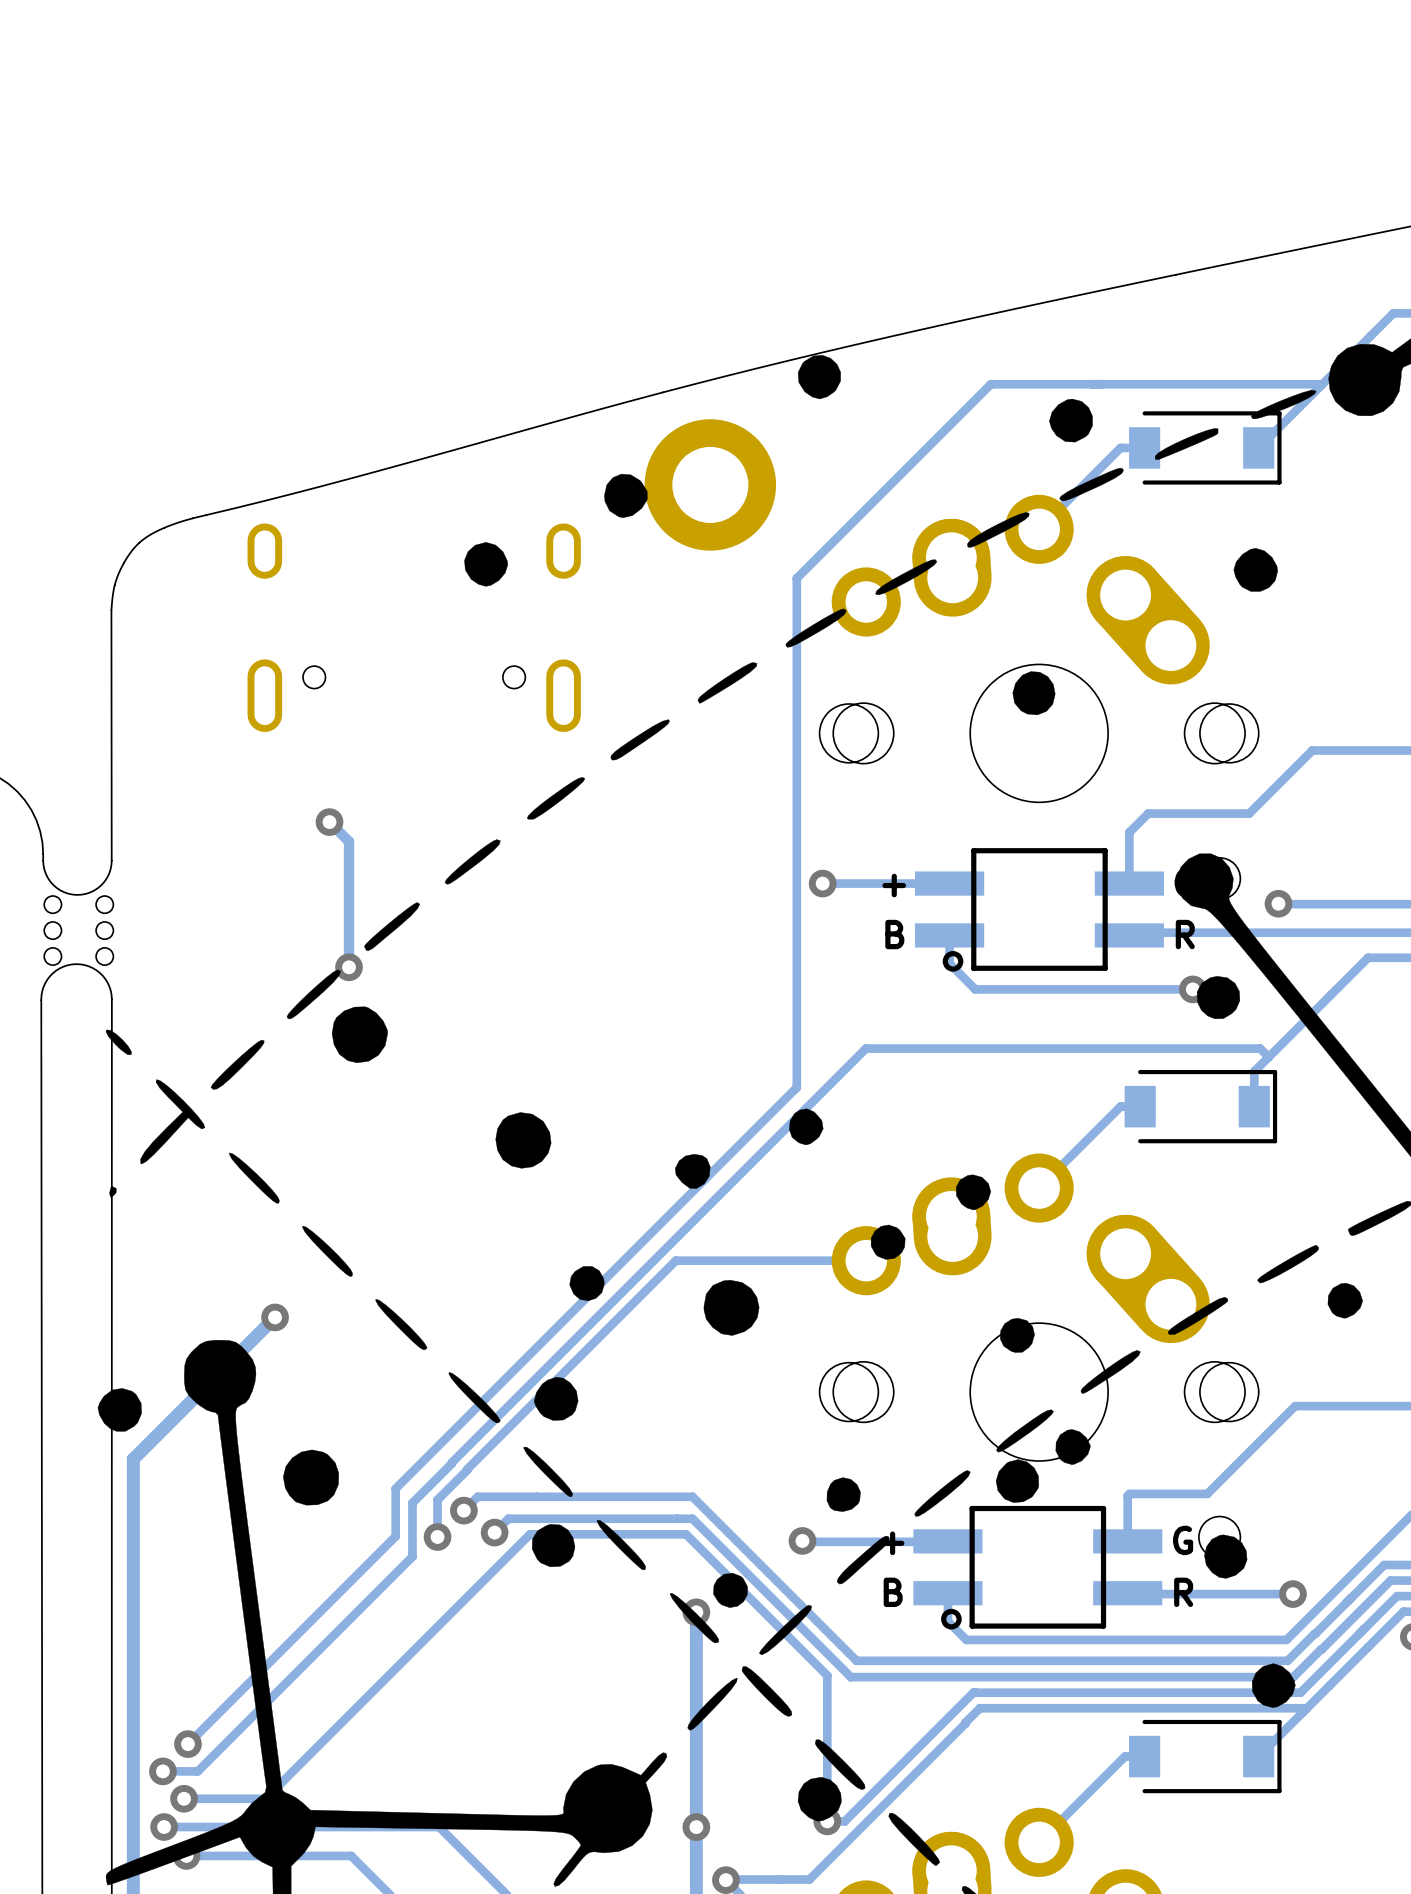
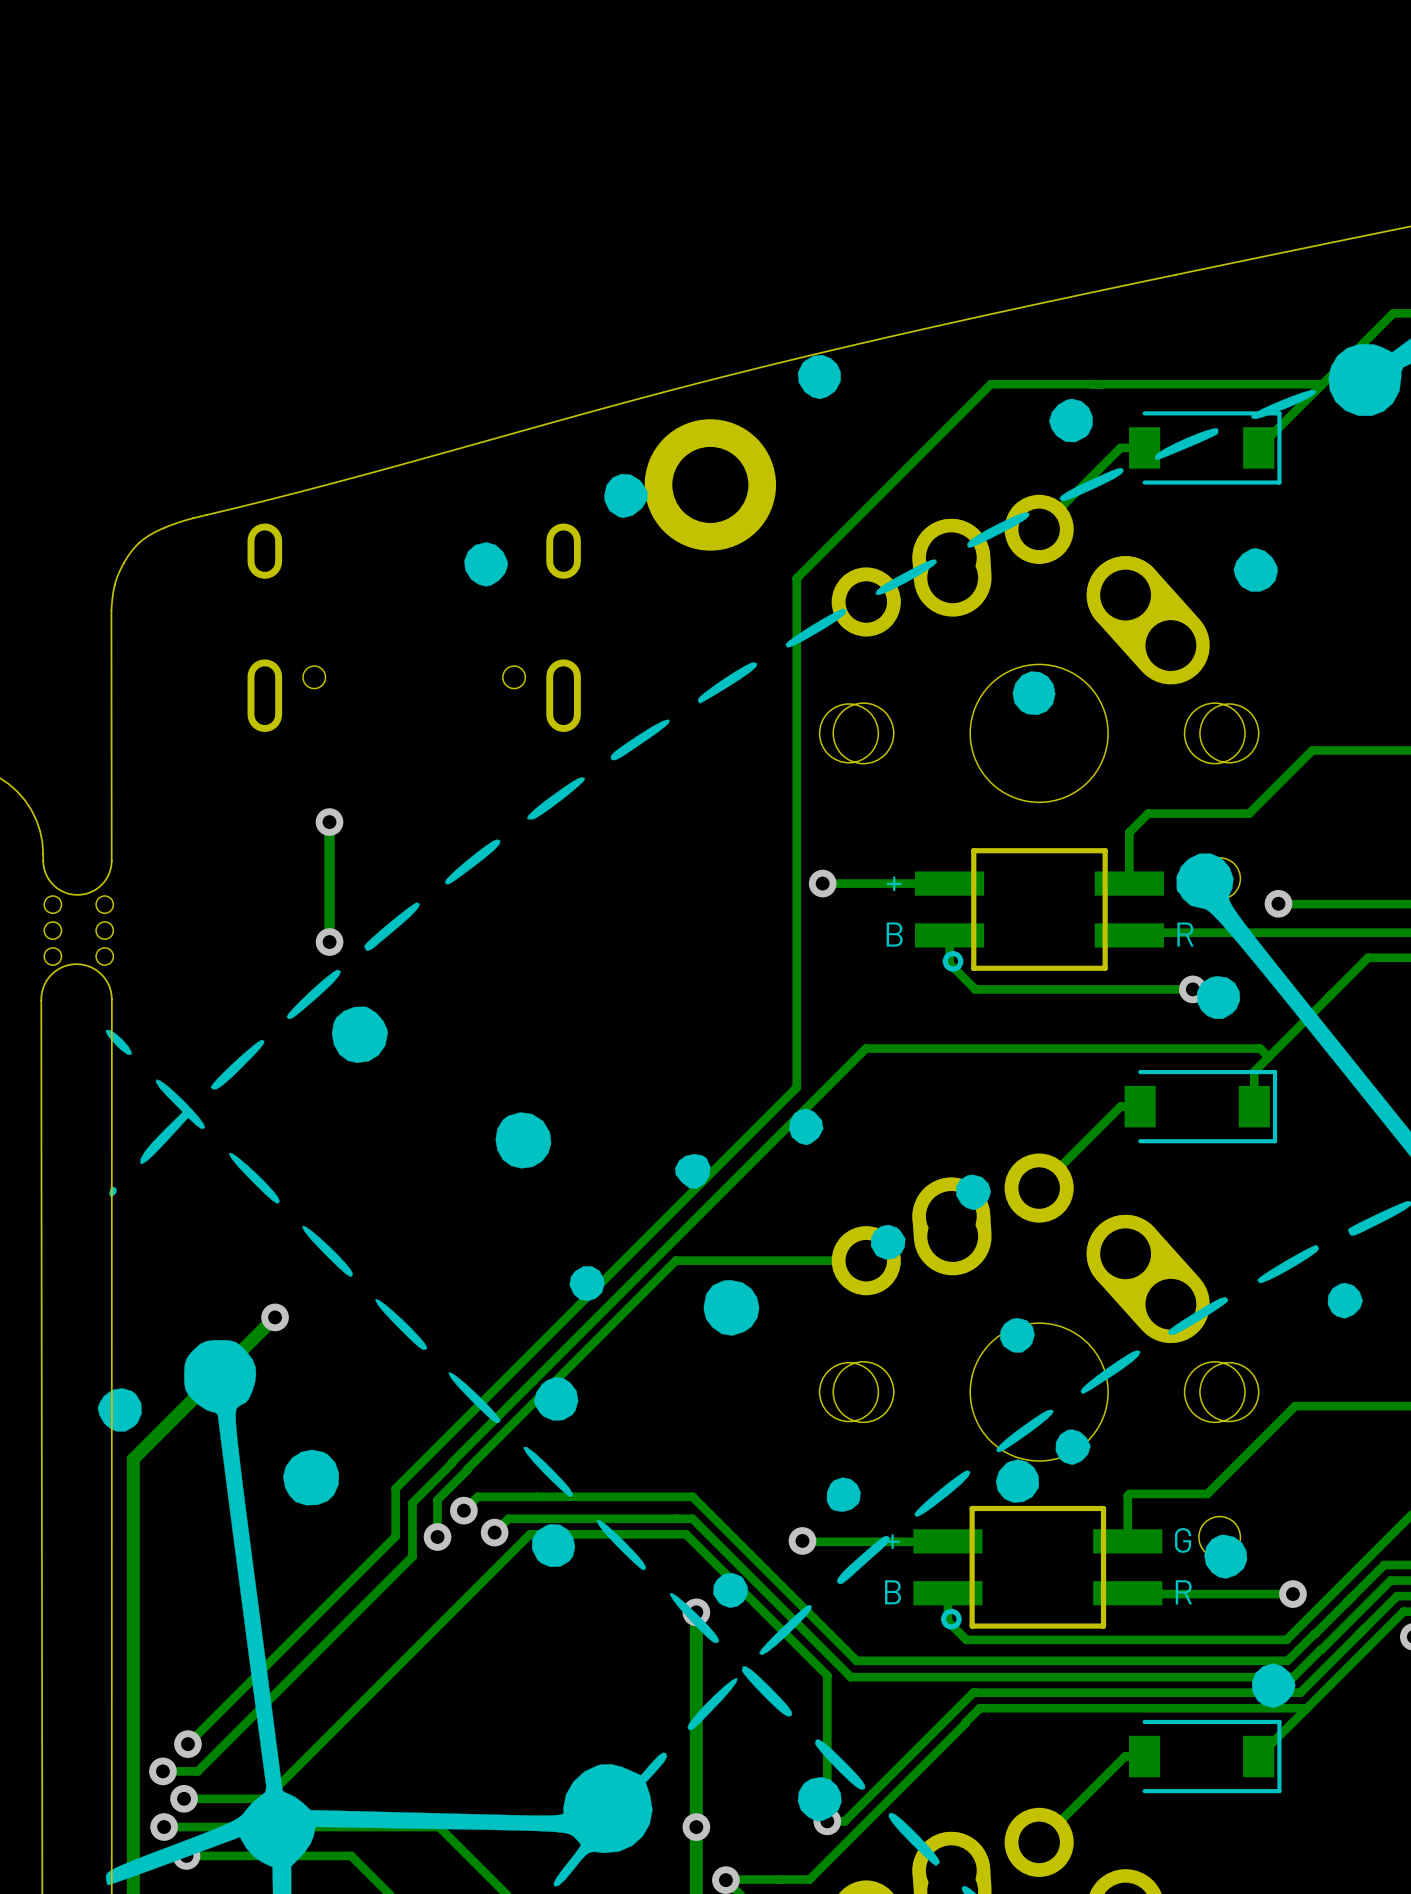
track: none -> (329, 822) (329, 941)
track: (331, 822) (329, 822) (349, 841) (349, 967) -> none
via position: (349, 967) -> (329, 942)

